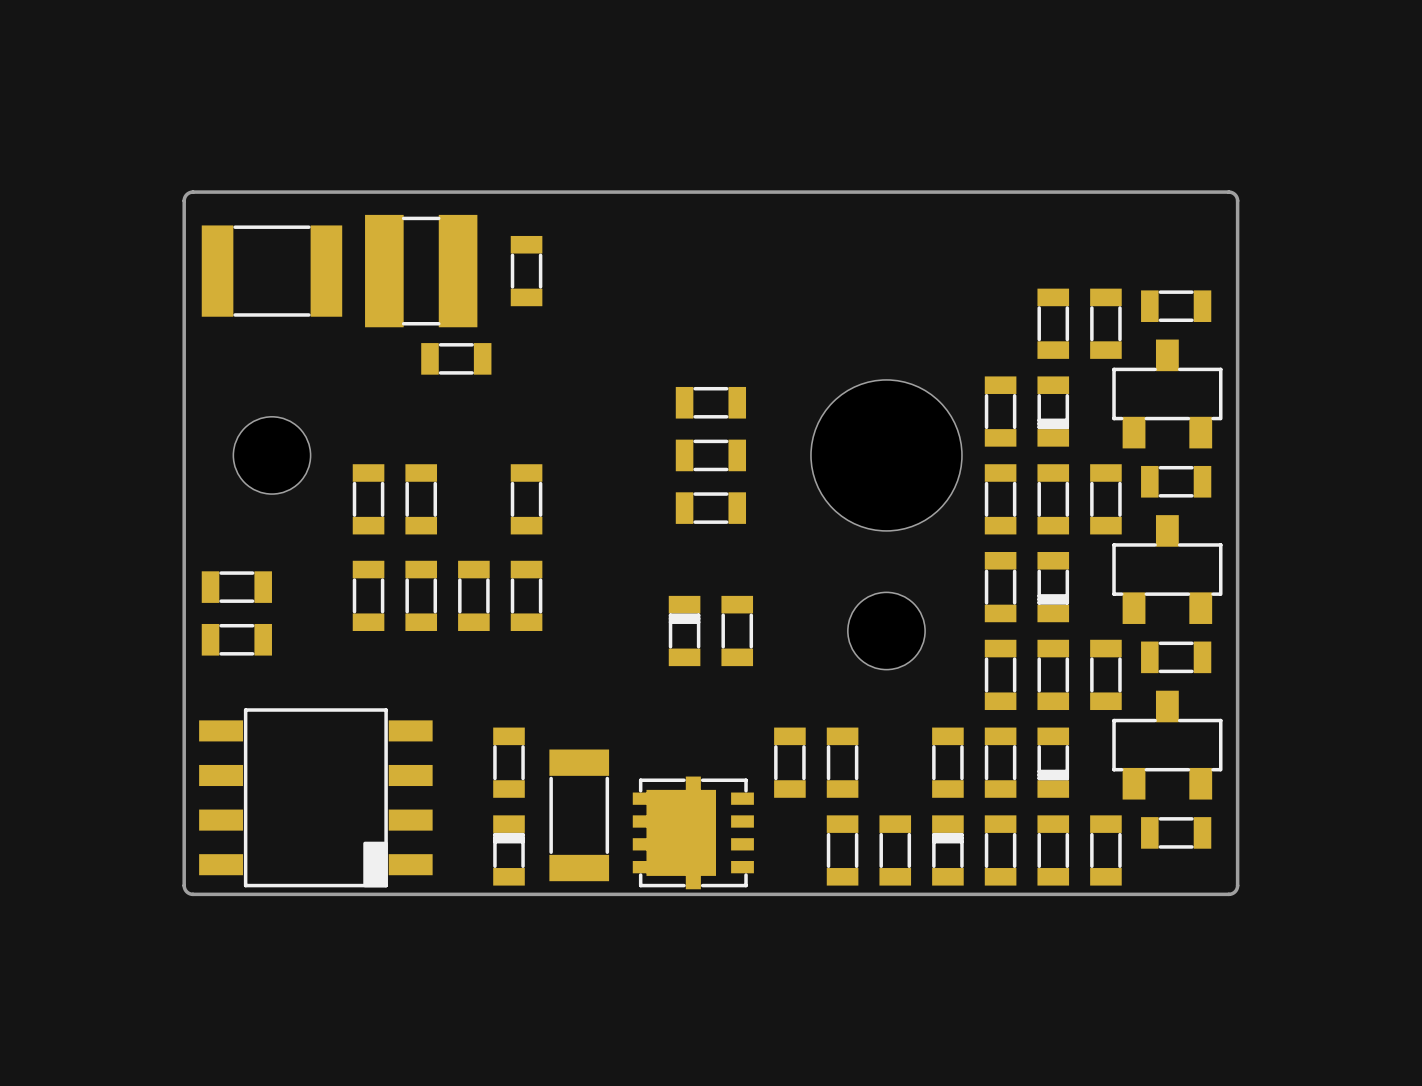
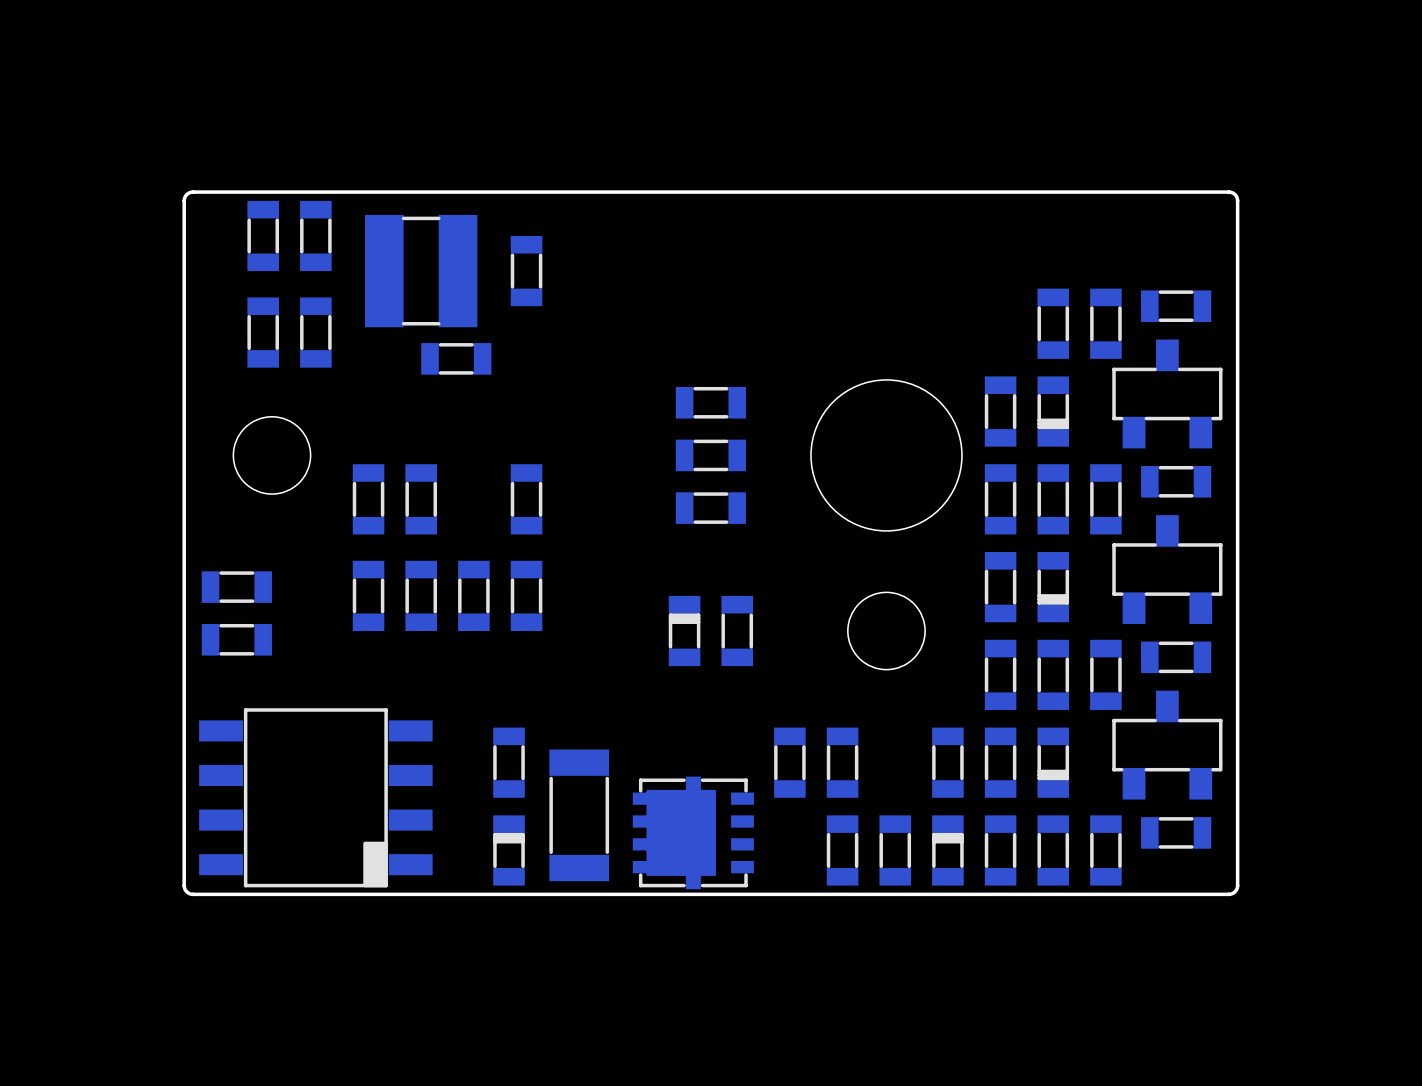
part: none -> (263, 235)
part: none -> (315, 235)
part: (271, 271) -> none
part: none -> (263, 332)
part: none -> (315, 332)

